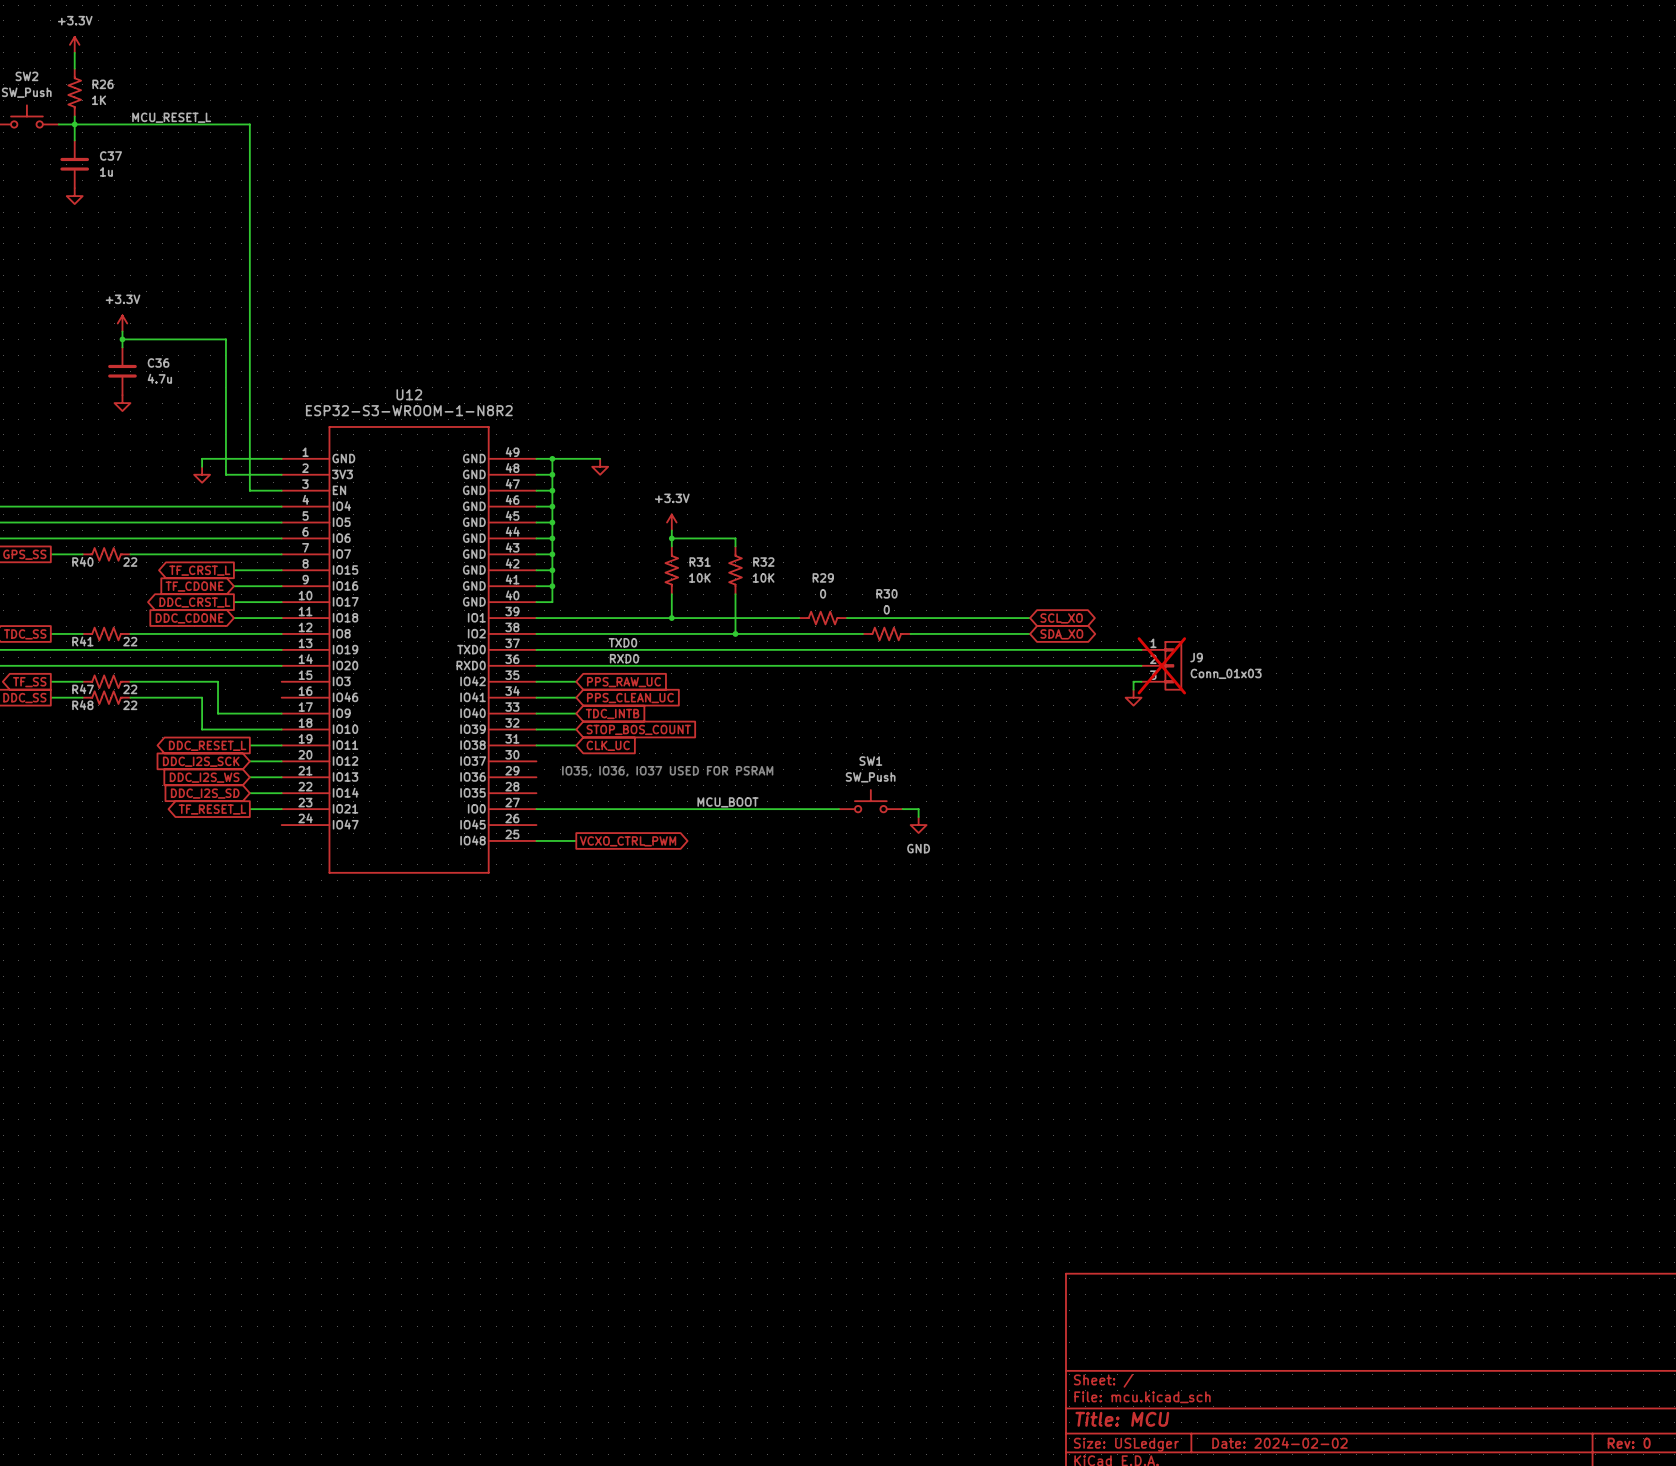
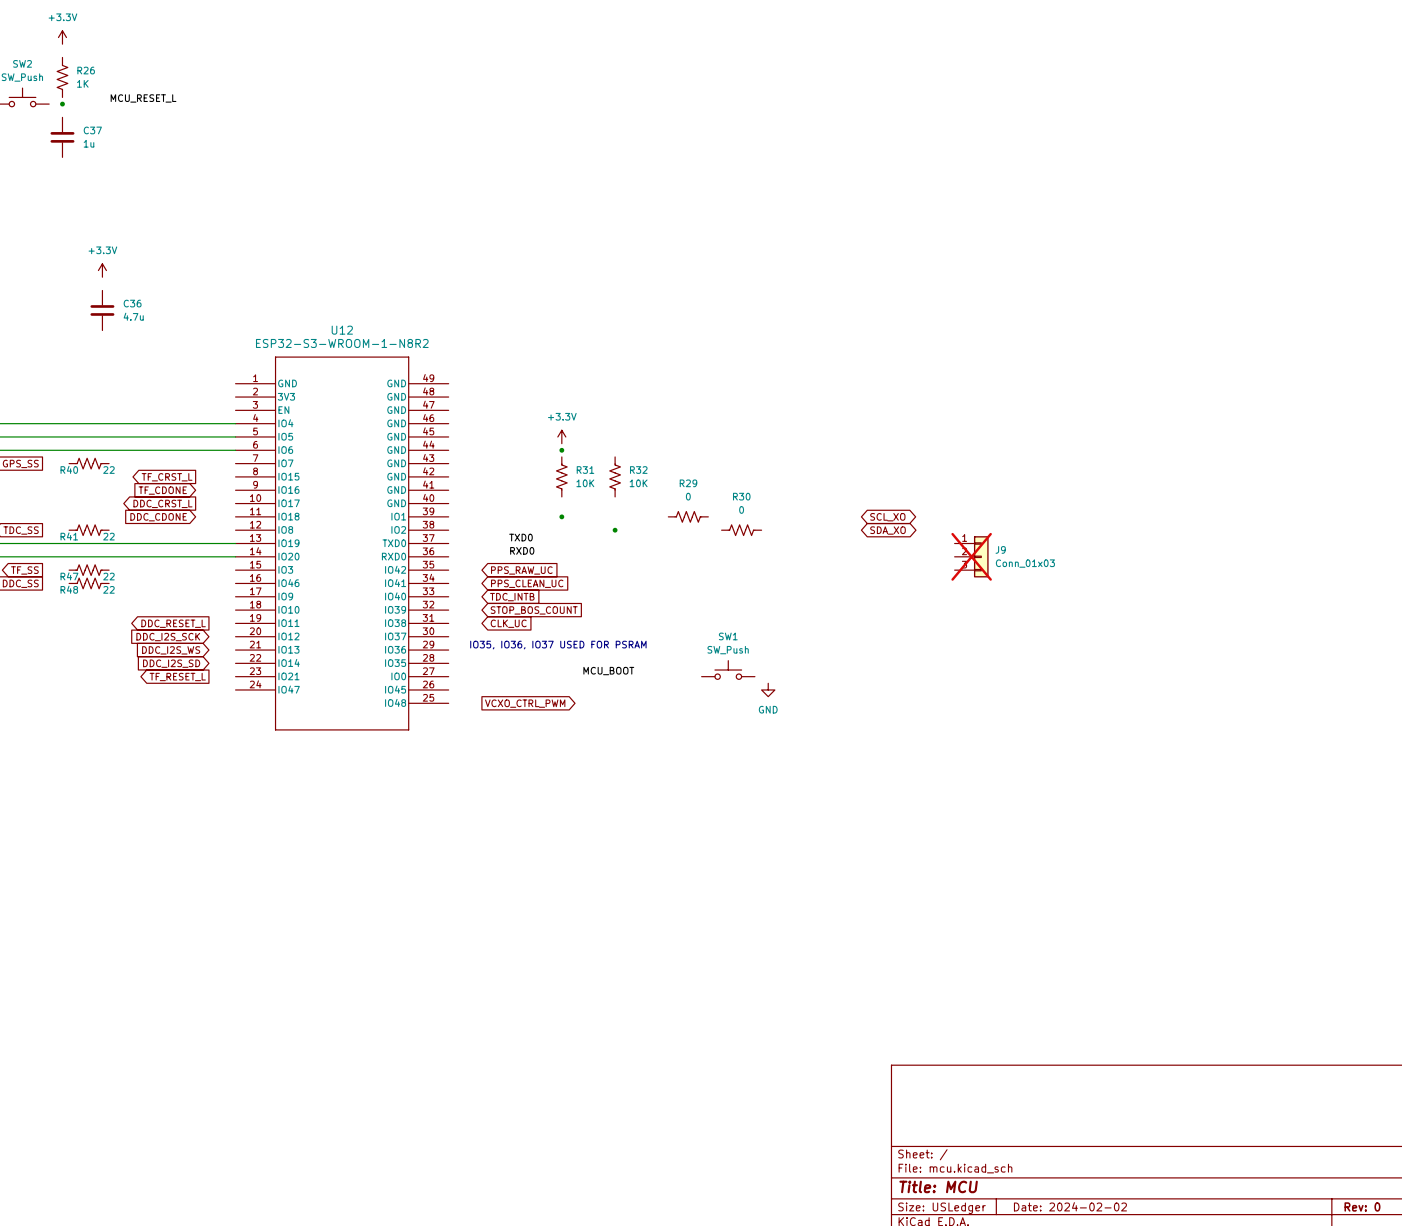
wire: (74, 52) (74, 68) -> none
wire: (74, 116) (74, 140) -> none
wire: (58, 124) (249, 124) (249, 490) (281, 490) -> none
power symbol: (74, 196) -> none
wire: (122, 331) (122, 347) -> none
wire: (122, 339) (225, 339) (225, 474) (281, 474) -> none
junction: (122, 339) -> none
power symbol: (122, 403) -> none
wire: (281, 458) (202, 458) (202, 466) -> none
wire: (536, 458) (600, 458) -> none
wire: (552, 458) (552, 602) (536, 602) -> none
junction: (552, 458) -> none
power symbol: (600, 466) -> none
power symbol: (202, 474) -> none
wire: (536, 474) (552, 474) -> none
junction: (552, 474) -> none
wire: (536, 490) (552, 490) -> none
junction: (552, 490) -> none
wire: (536, 506) (552, 506) -> none
junction: (552, 506) -> none
wire: (536, 522) (552, 522) -> none
junction: (552, 522) -> none
wire: (671, 530) (671, 546) -> none
wire: (536, 538) (552, 538) -> none
junction: (552, 538) -> none
wire: (671, 538) (735, 538) (735, 546) -> none
wire: (50, 554) (82, 554) -> none
wire: (130, 554) (281, 554) -> none
wire: (536, 554) (552, 554) -> none
junction: (552, 554) -> none
wire: (233, 570) (281, 570) -> none
wire: (536, 570) (552, 570) -> none
junction: (552, 570) -> none
wire: (233, 586) (281, 586) -> none
wire: (536, 586) (552, 586) -> none
junction: (552, 586) -> none
wire: (671, 594) (671, 618) -> none
wire: (735, 594) (735, 633) -> none
wire: (233, 602) (281, 602) -> none
wire: (233, 618) (281, 618) -> none
wire: (536, 618) (799, 618) -> none
wire: (846, 618) (1030, 618) -> none
wire: (50, 633) (82, 633) -> none
wire: (130, 633) (281, 633) -> none
wire: (536, 633) (862, 633) -> none
wire: (910, 633) (1030, 633) -> none
wire: (536, 649) (1141, 649) -> none
wire: (536, 665) (1141, 665) -> none
wire: (50, 681) (82, 681) -> none
wire: (130, 681) (218, 681) (218, 713) (281, 713) -> none
wire: (536, 681) (576, 681) -> none
wire: (1141, 681) (1133, 681) (1133, 689) -> none
wire: (50, 697) (82, 697) -> none
wire: (130, 697) (202, 697) (202, 729) (281, 729) -> none
wire: (536, 697) (576, 697) -> none
power symbol: (1133, 697) -> none
wire: (536, 713) (576, 713) -> none
wire: (536, 729) (576, 729) -> none
wire: (249, 745) (281, 745) -> none
wire: (536, 745) (576, 745) -> none
wire: (249, 761) (281, 761) -> none
wire: (249, 777) (281, 777) -> none
wire: (249, 793) (281, 793) -> none
wire: (249, 809) (281, 809) -> none
wire: (536, 809) (838, 809) -> none
wire: (902, 809) (918, 809) (918, 817) -> none
wire: (536, 840) (576, 840) -> none

